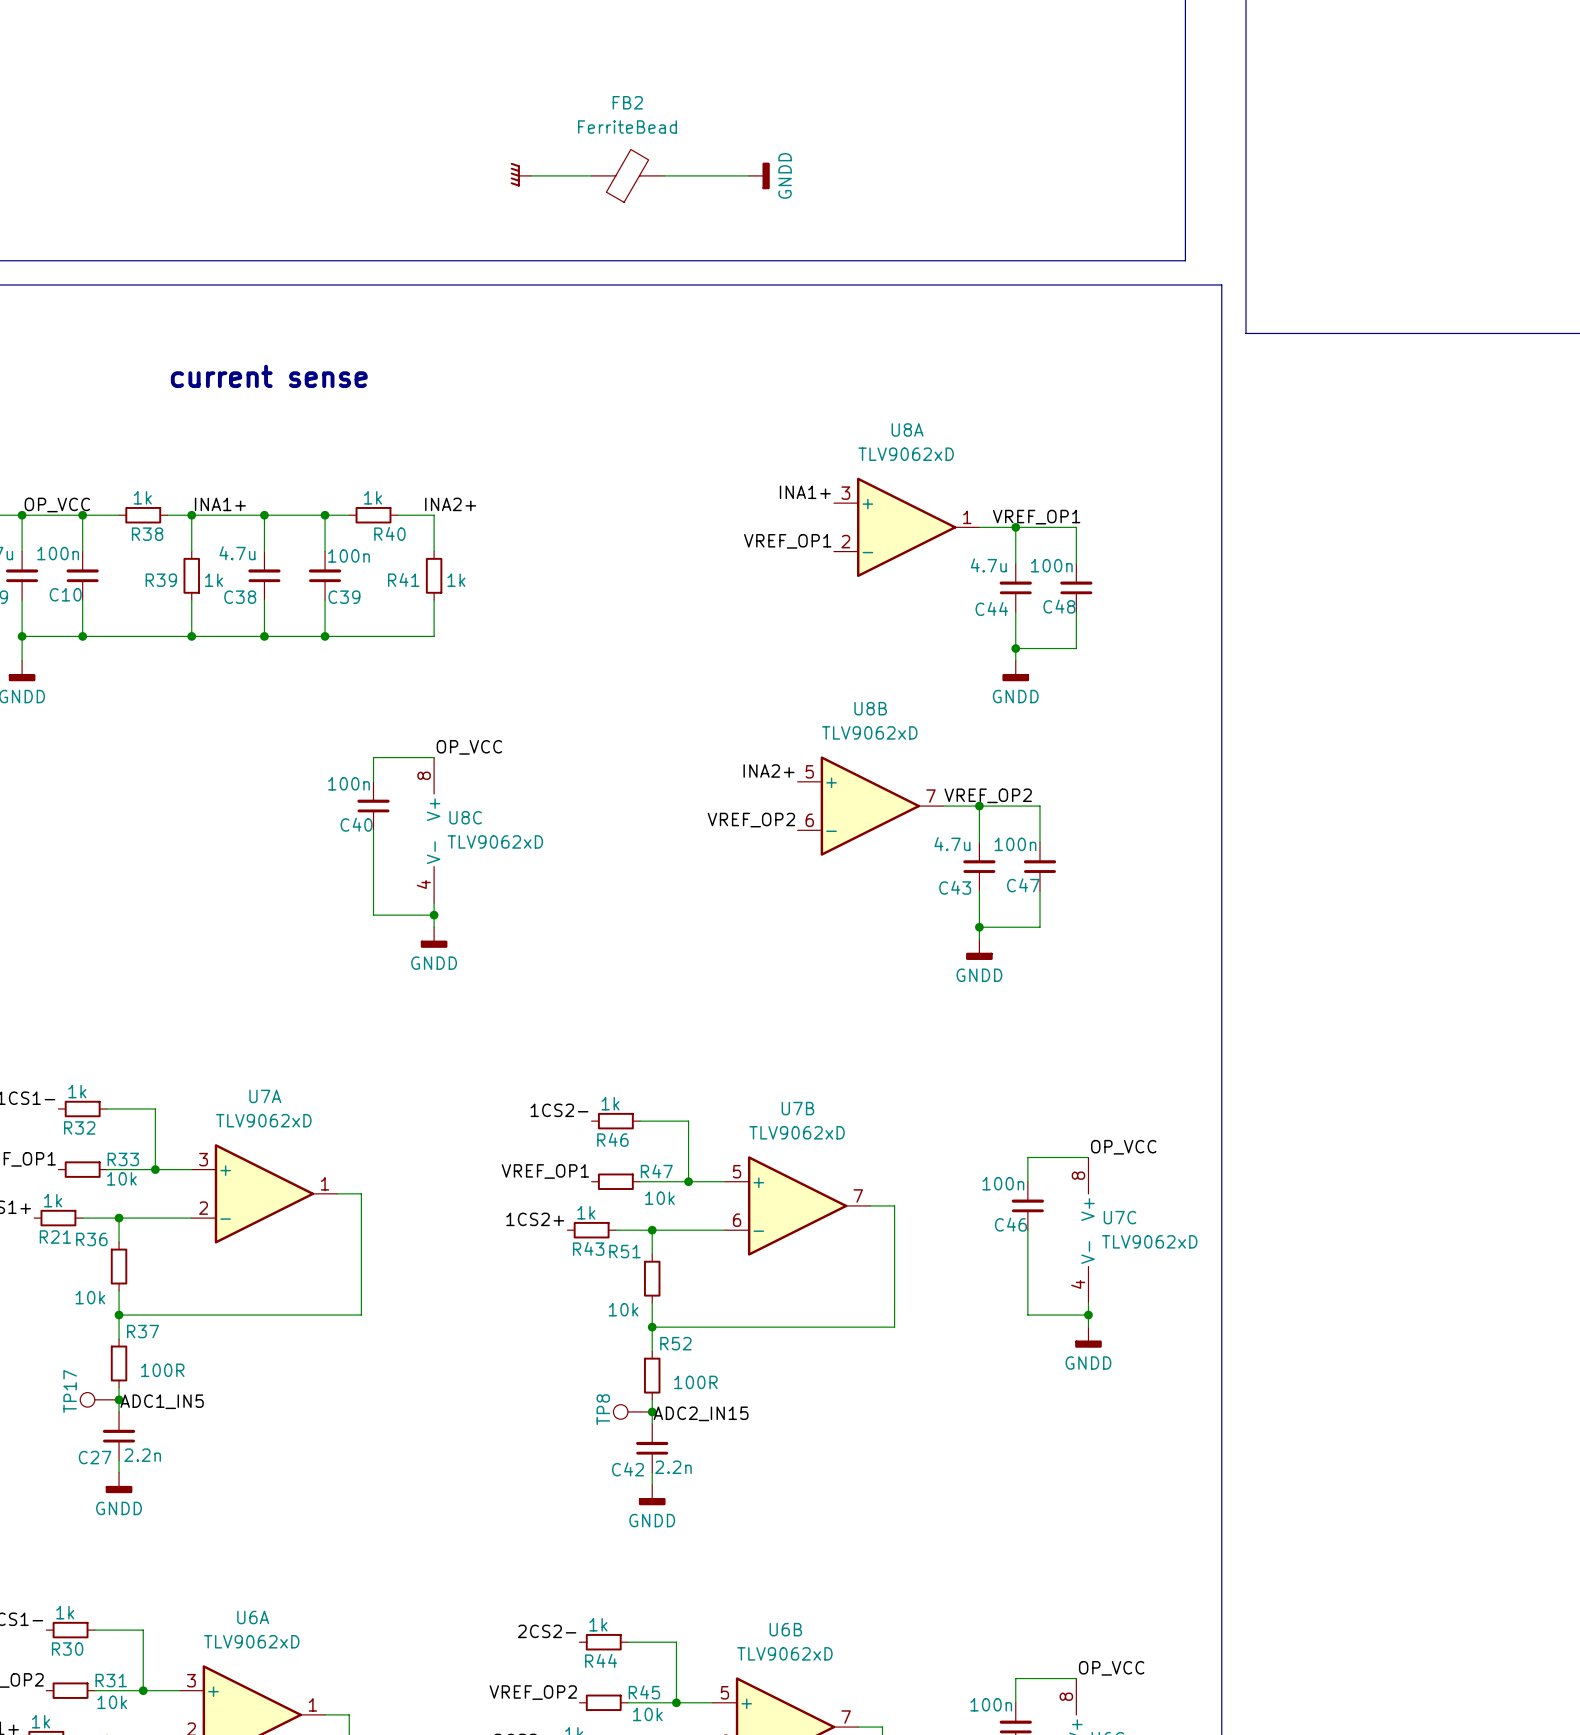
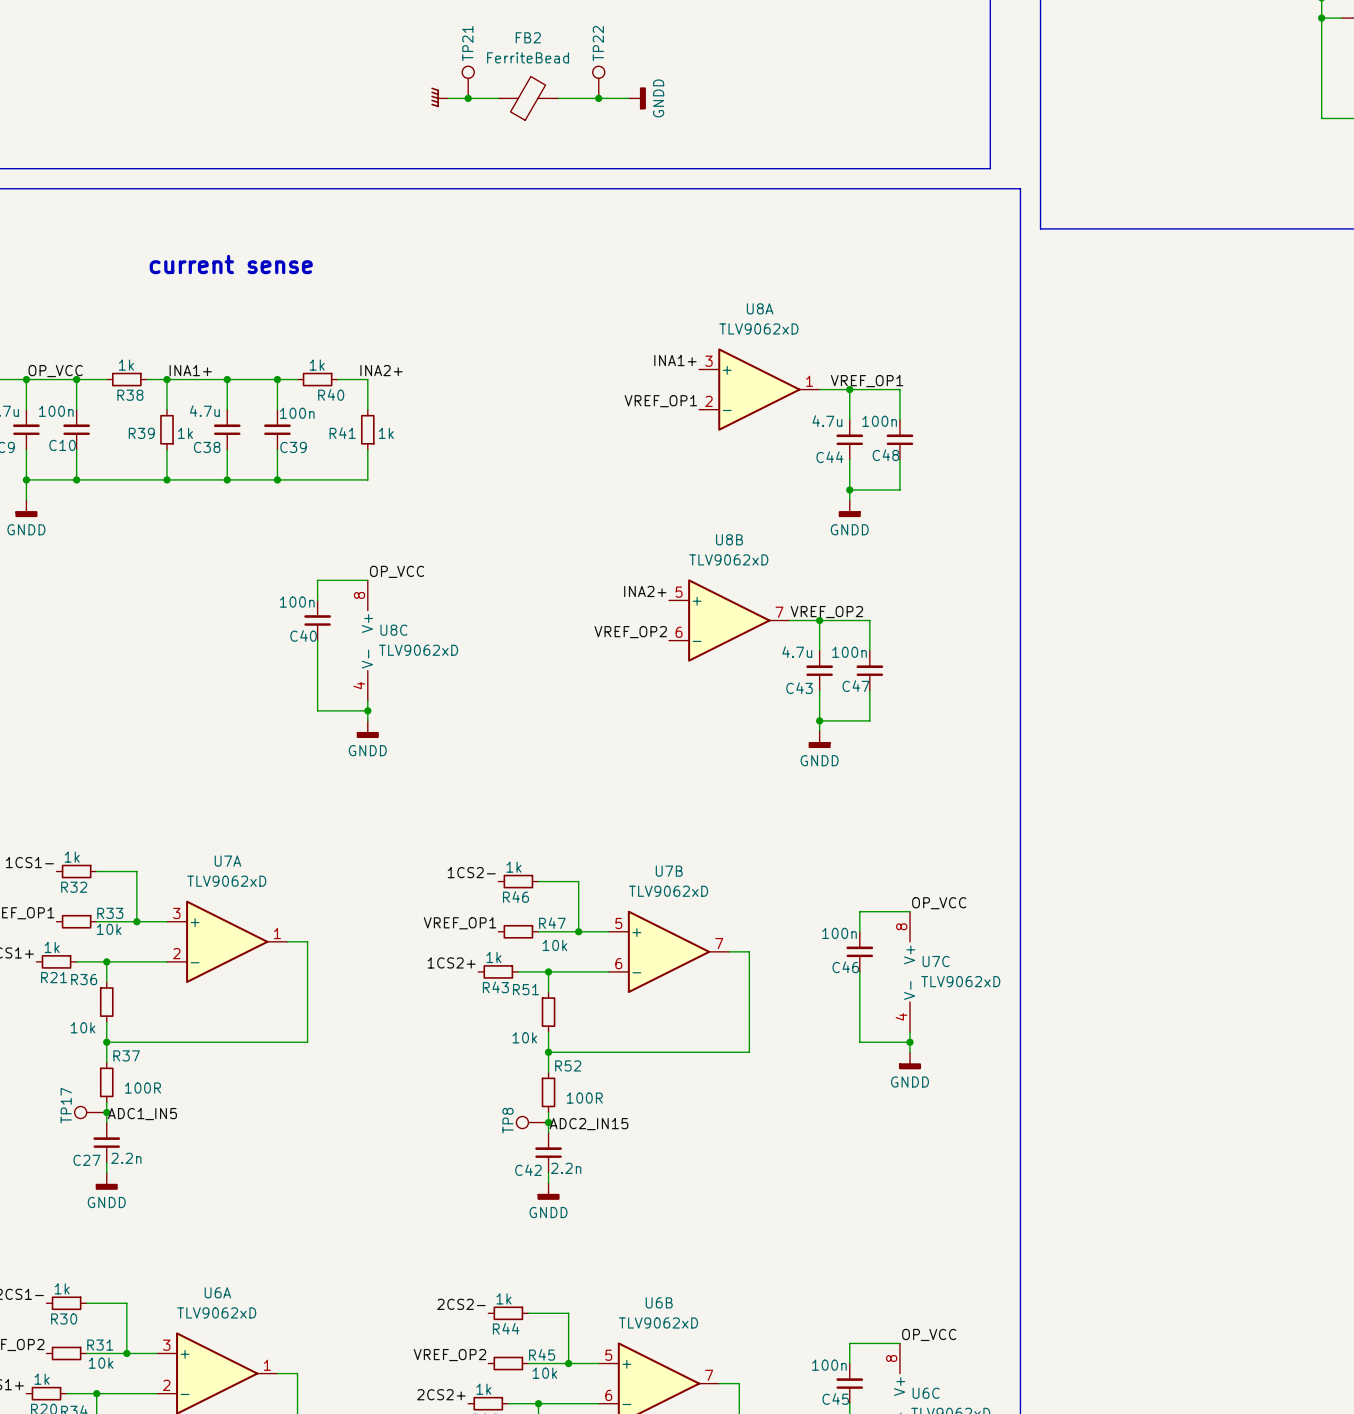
TP21: none -> (468, 82)
TP22: none -> (598, 82)
junction: none -> (468, 98)
junction: none -> (598, 98)

